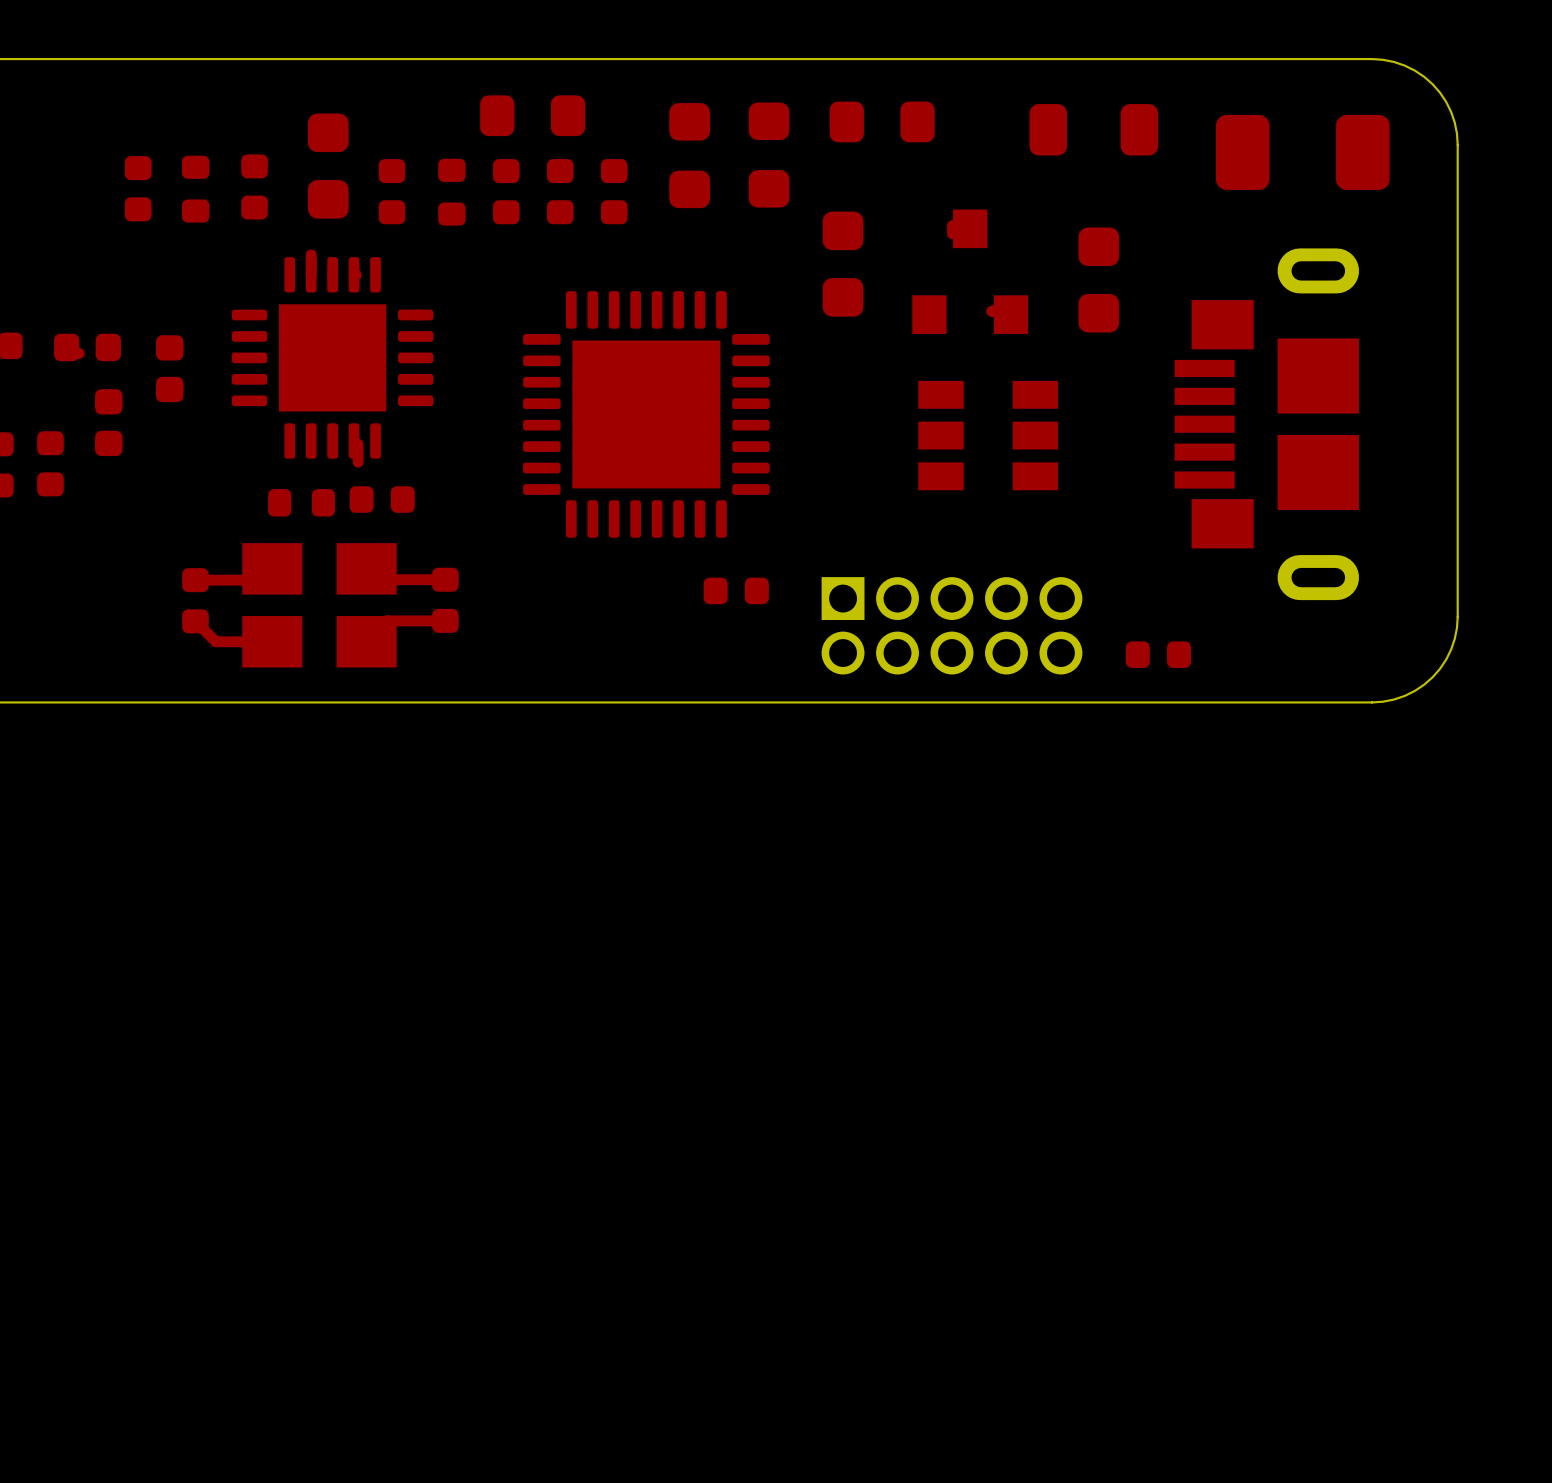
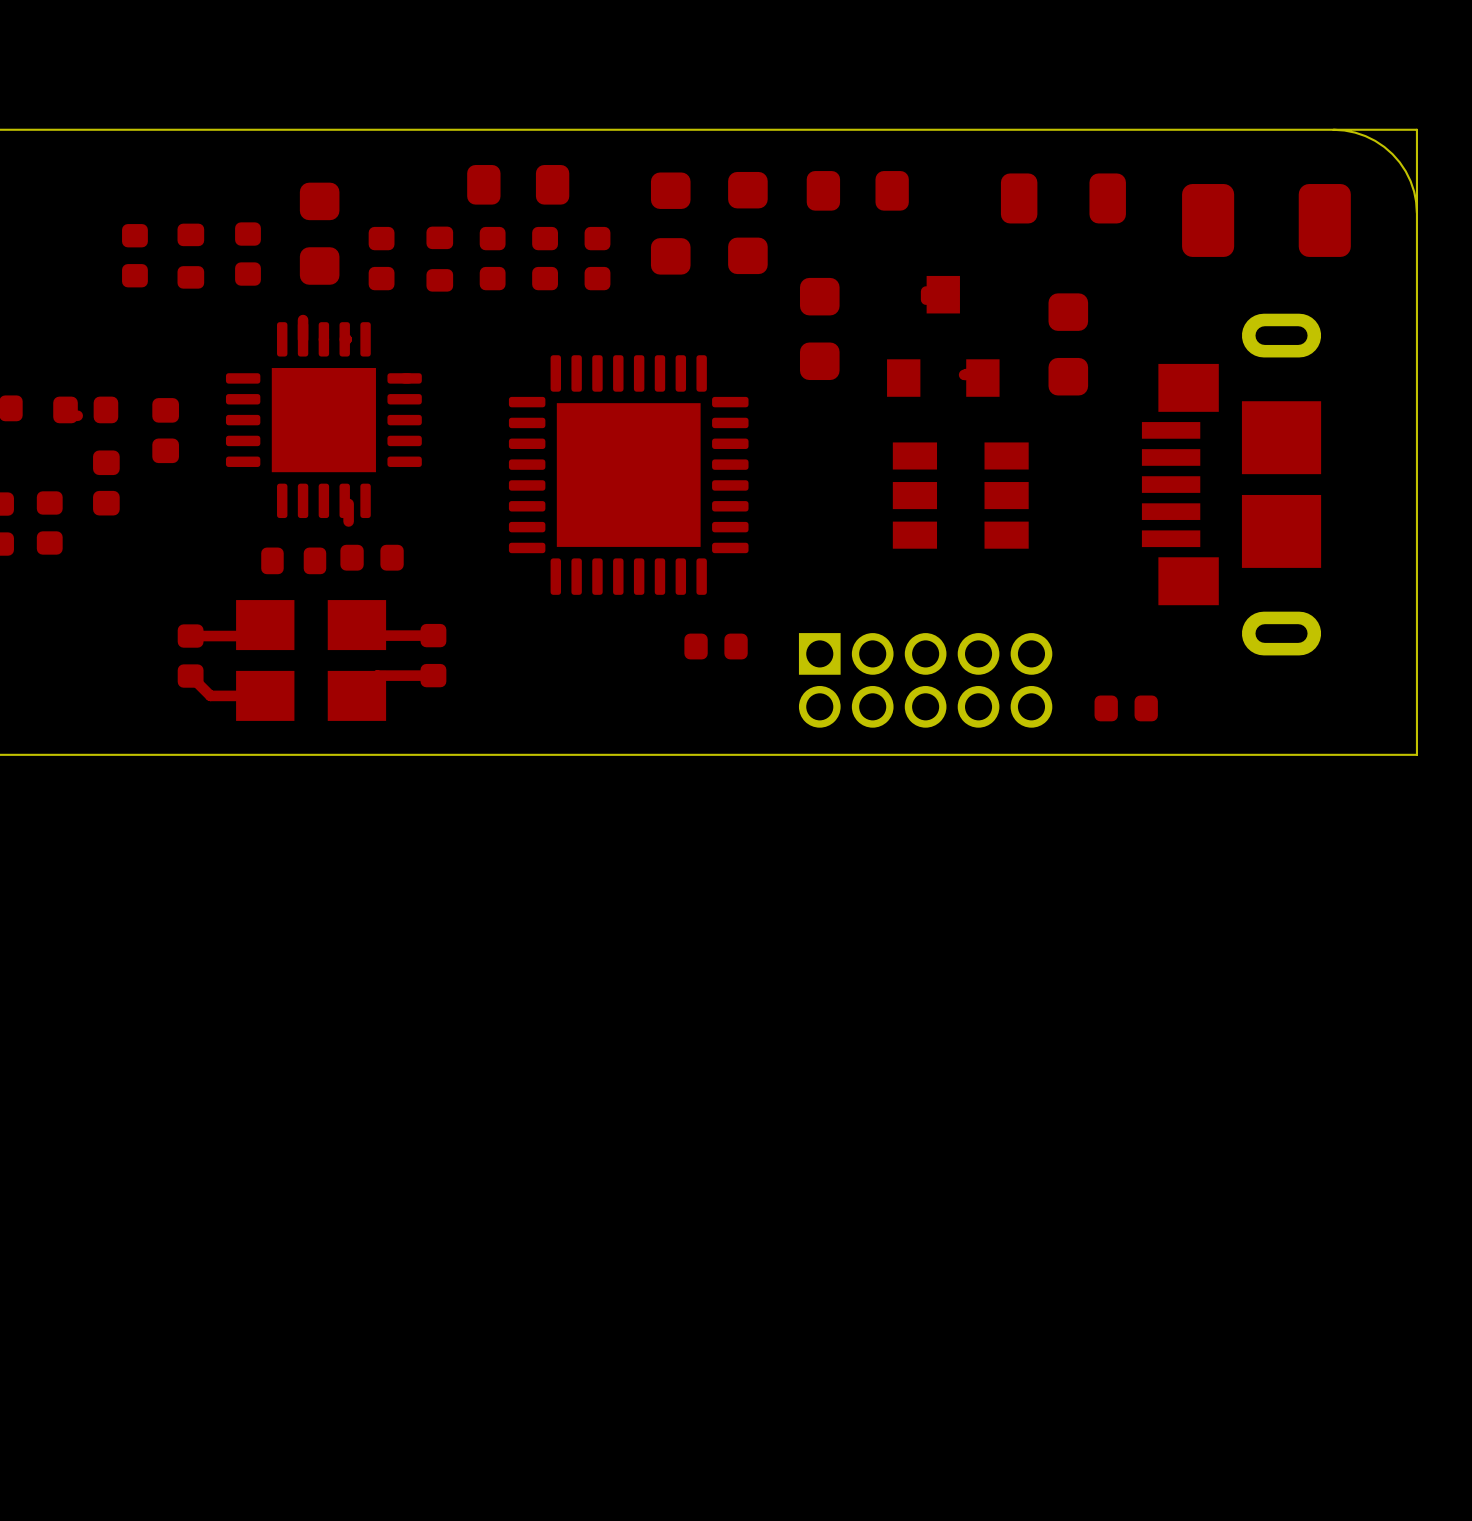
board edge: none -> (1333, 129) (1416, 129) (1416, 213)
board edge: (1457, 616) (1451, 649) (1432, 677) (1404, 695) (1371, 702) -> (1416, 671) (1416, 754) (1333, 754)

